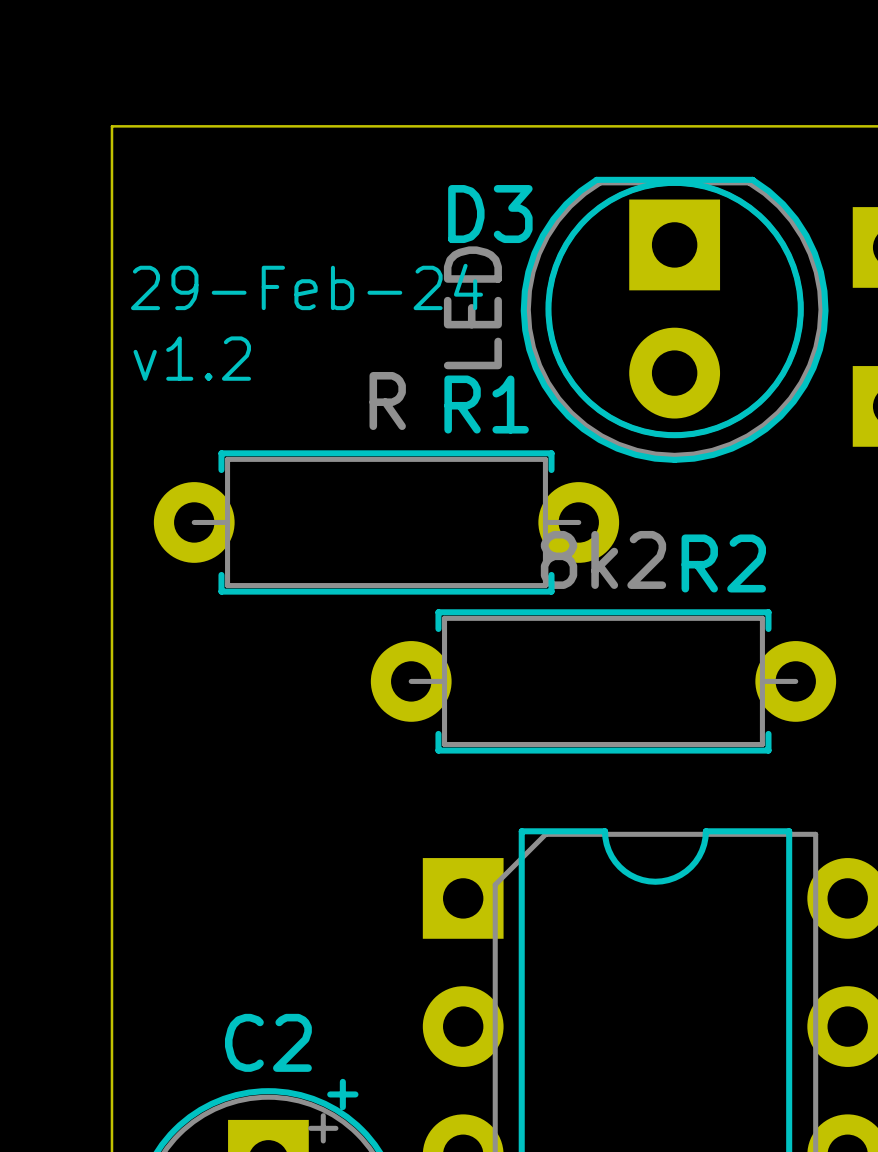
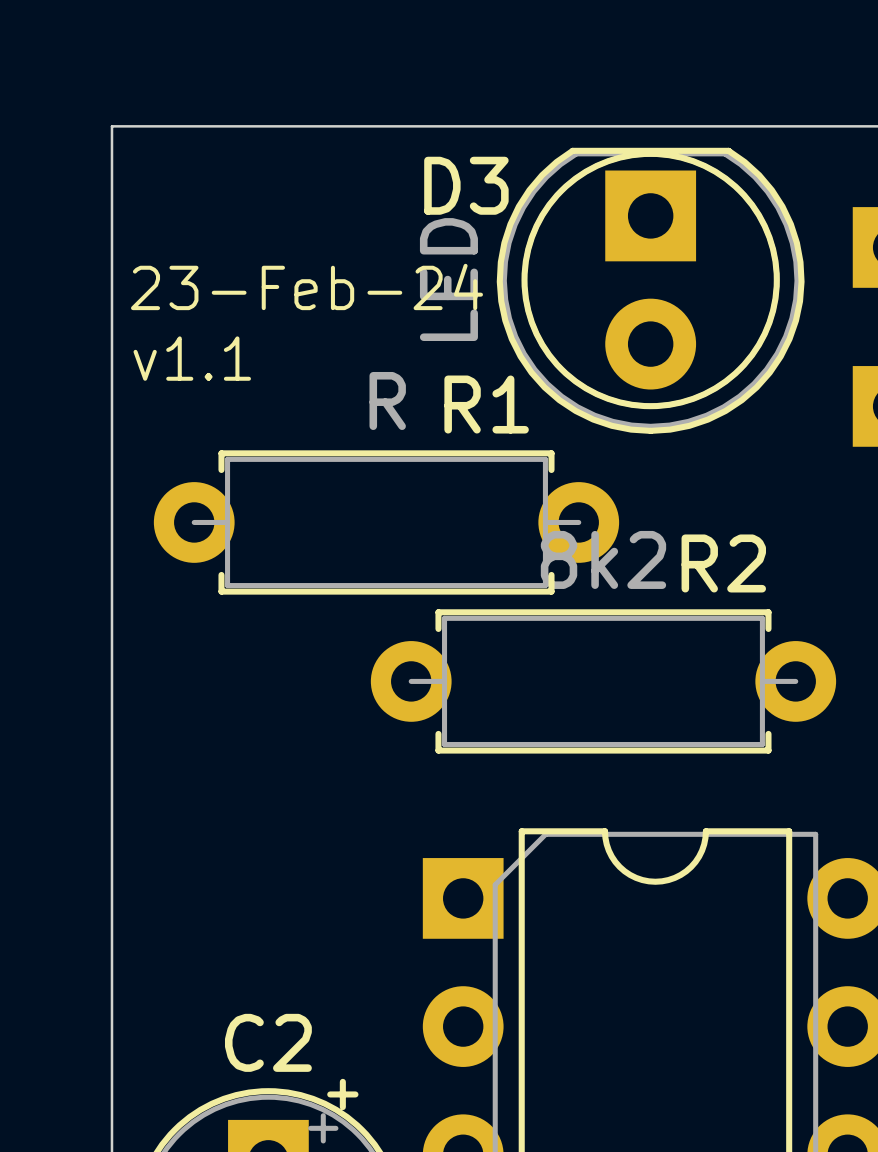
text: 29-Feb-24 (306, 286) -> 23-Feb-24 (306, 286)
D3 position: (674, 319) -> (650, 290)
text: v1.2 (192, 358) -> v1.1 (192, 358)

